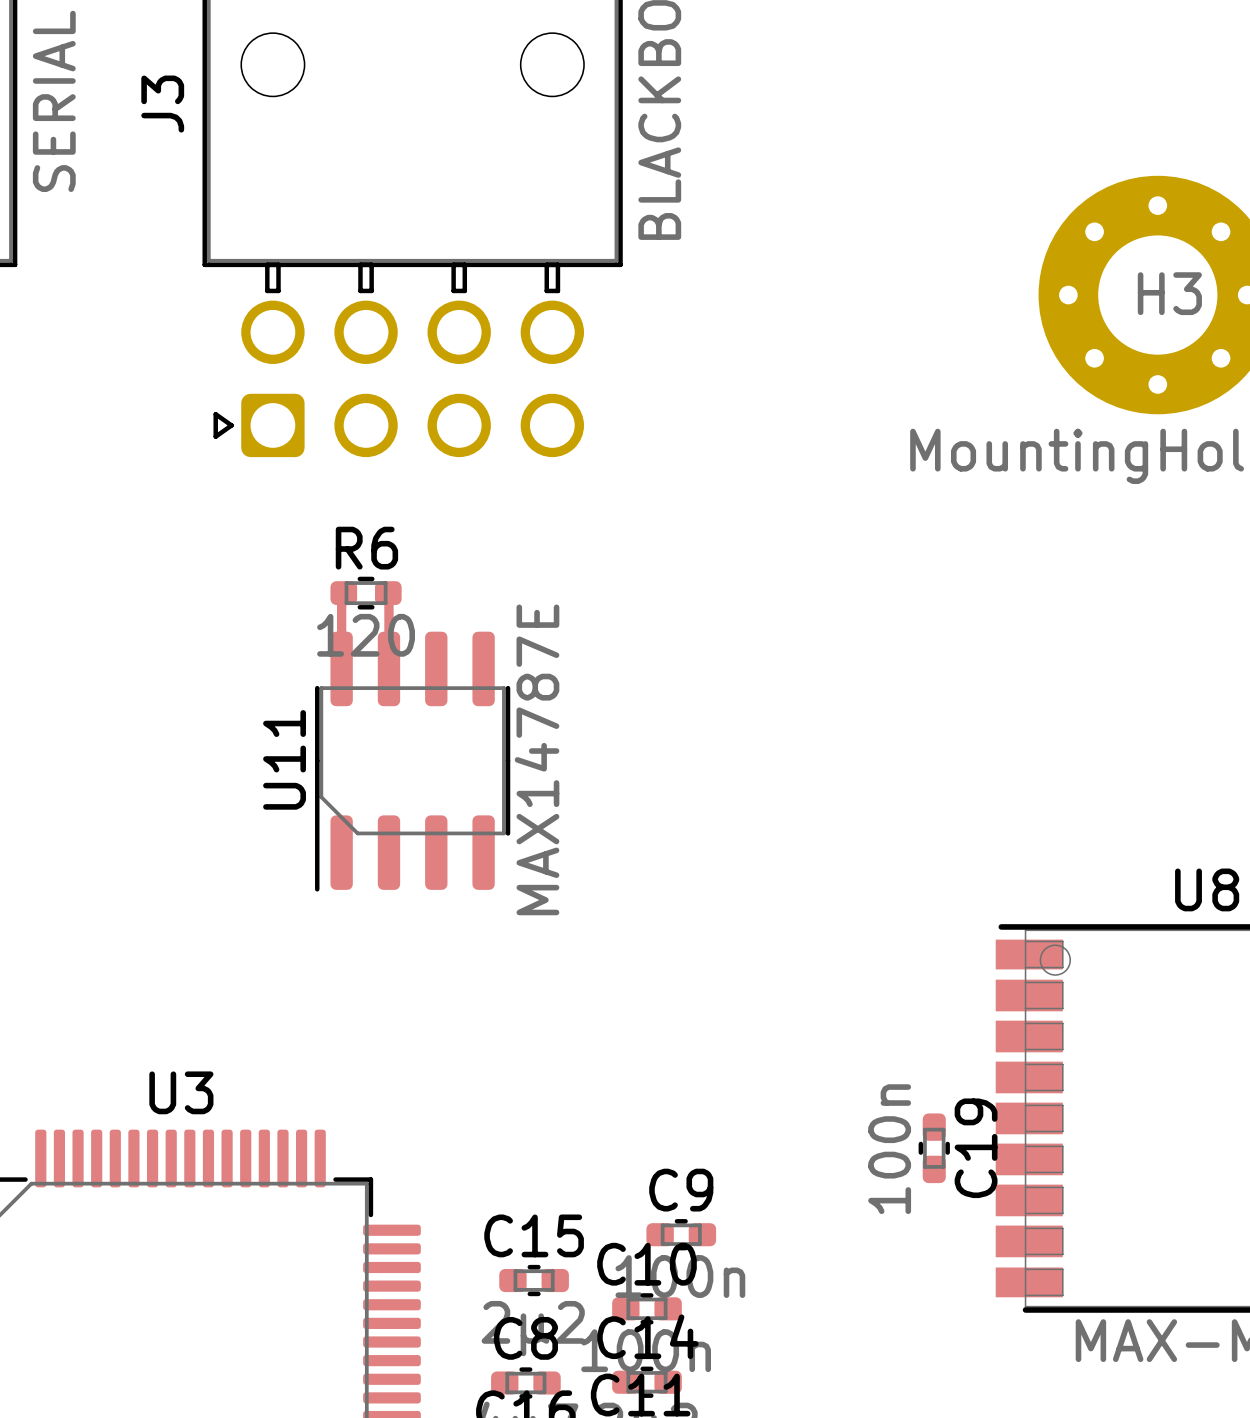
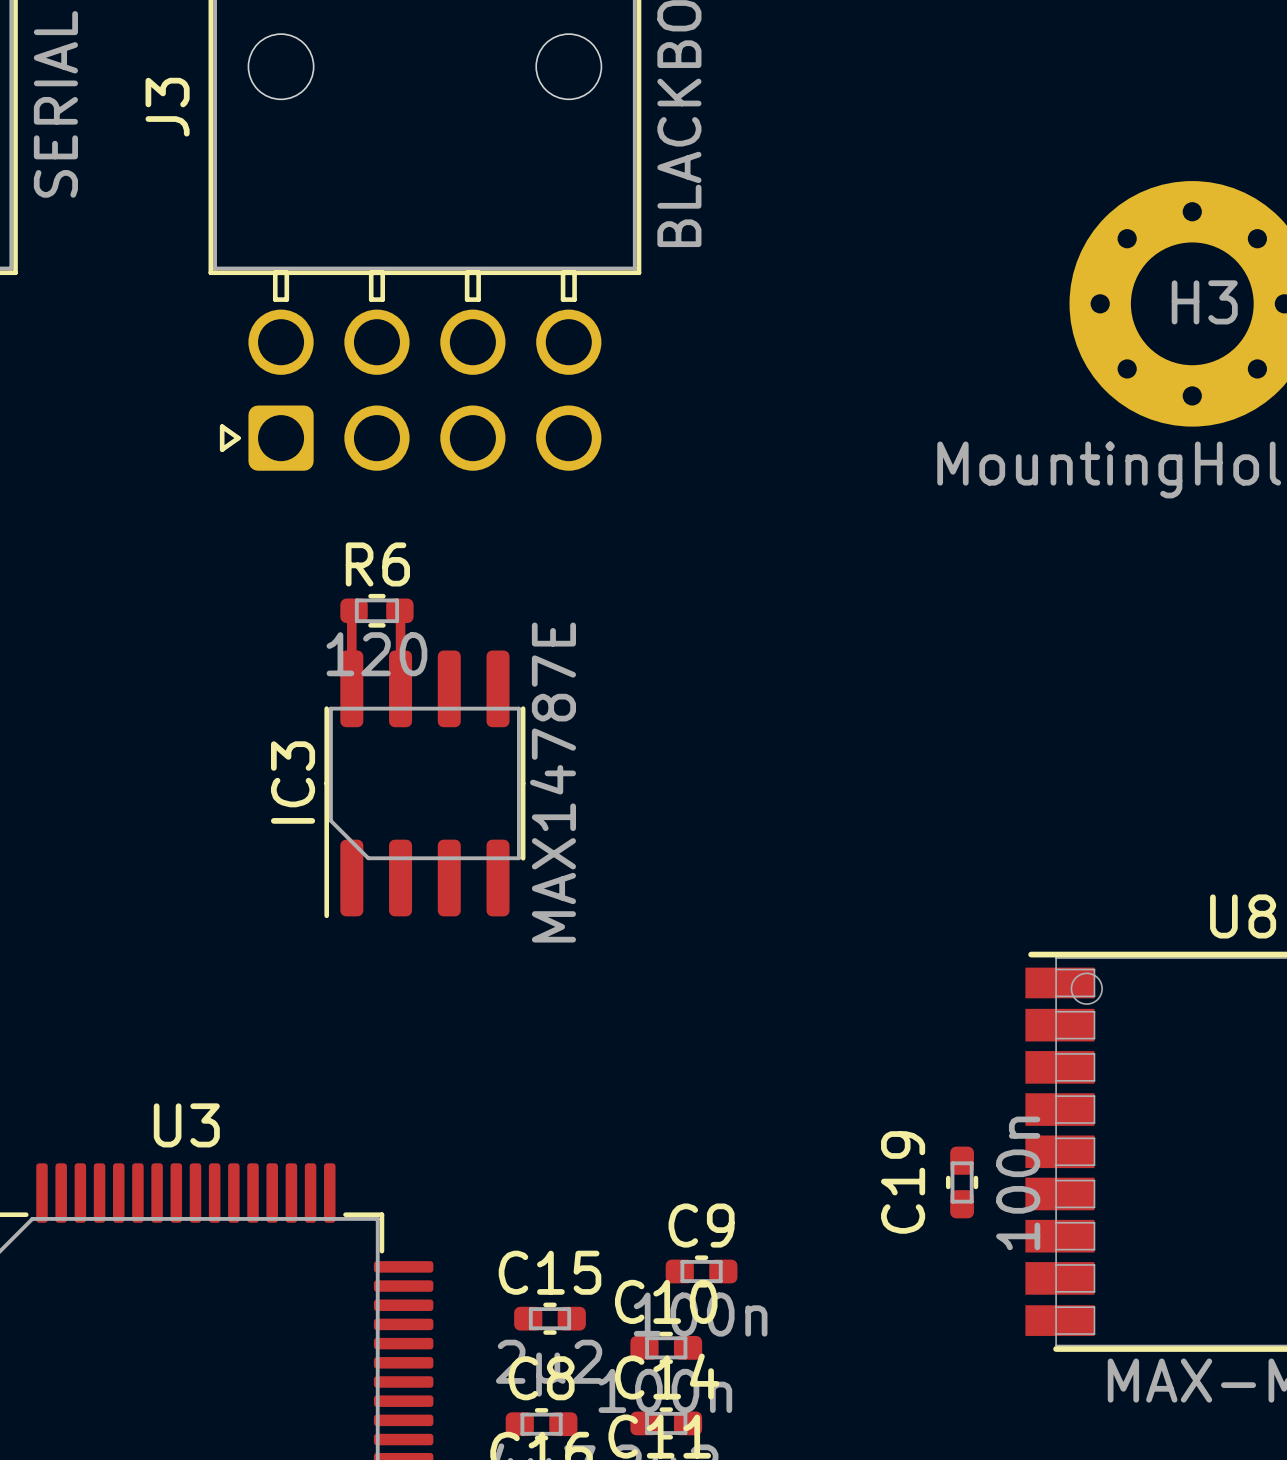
U11 name: U11 (284, 759) -> IC3 (293, 782)
C19 name position: C19 (976, 1148) -> C19 (903, 1182)
C19 value position: 100n (889, 1149) -> 100n (1018, 1183)

